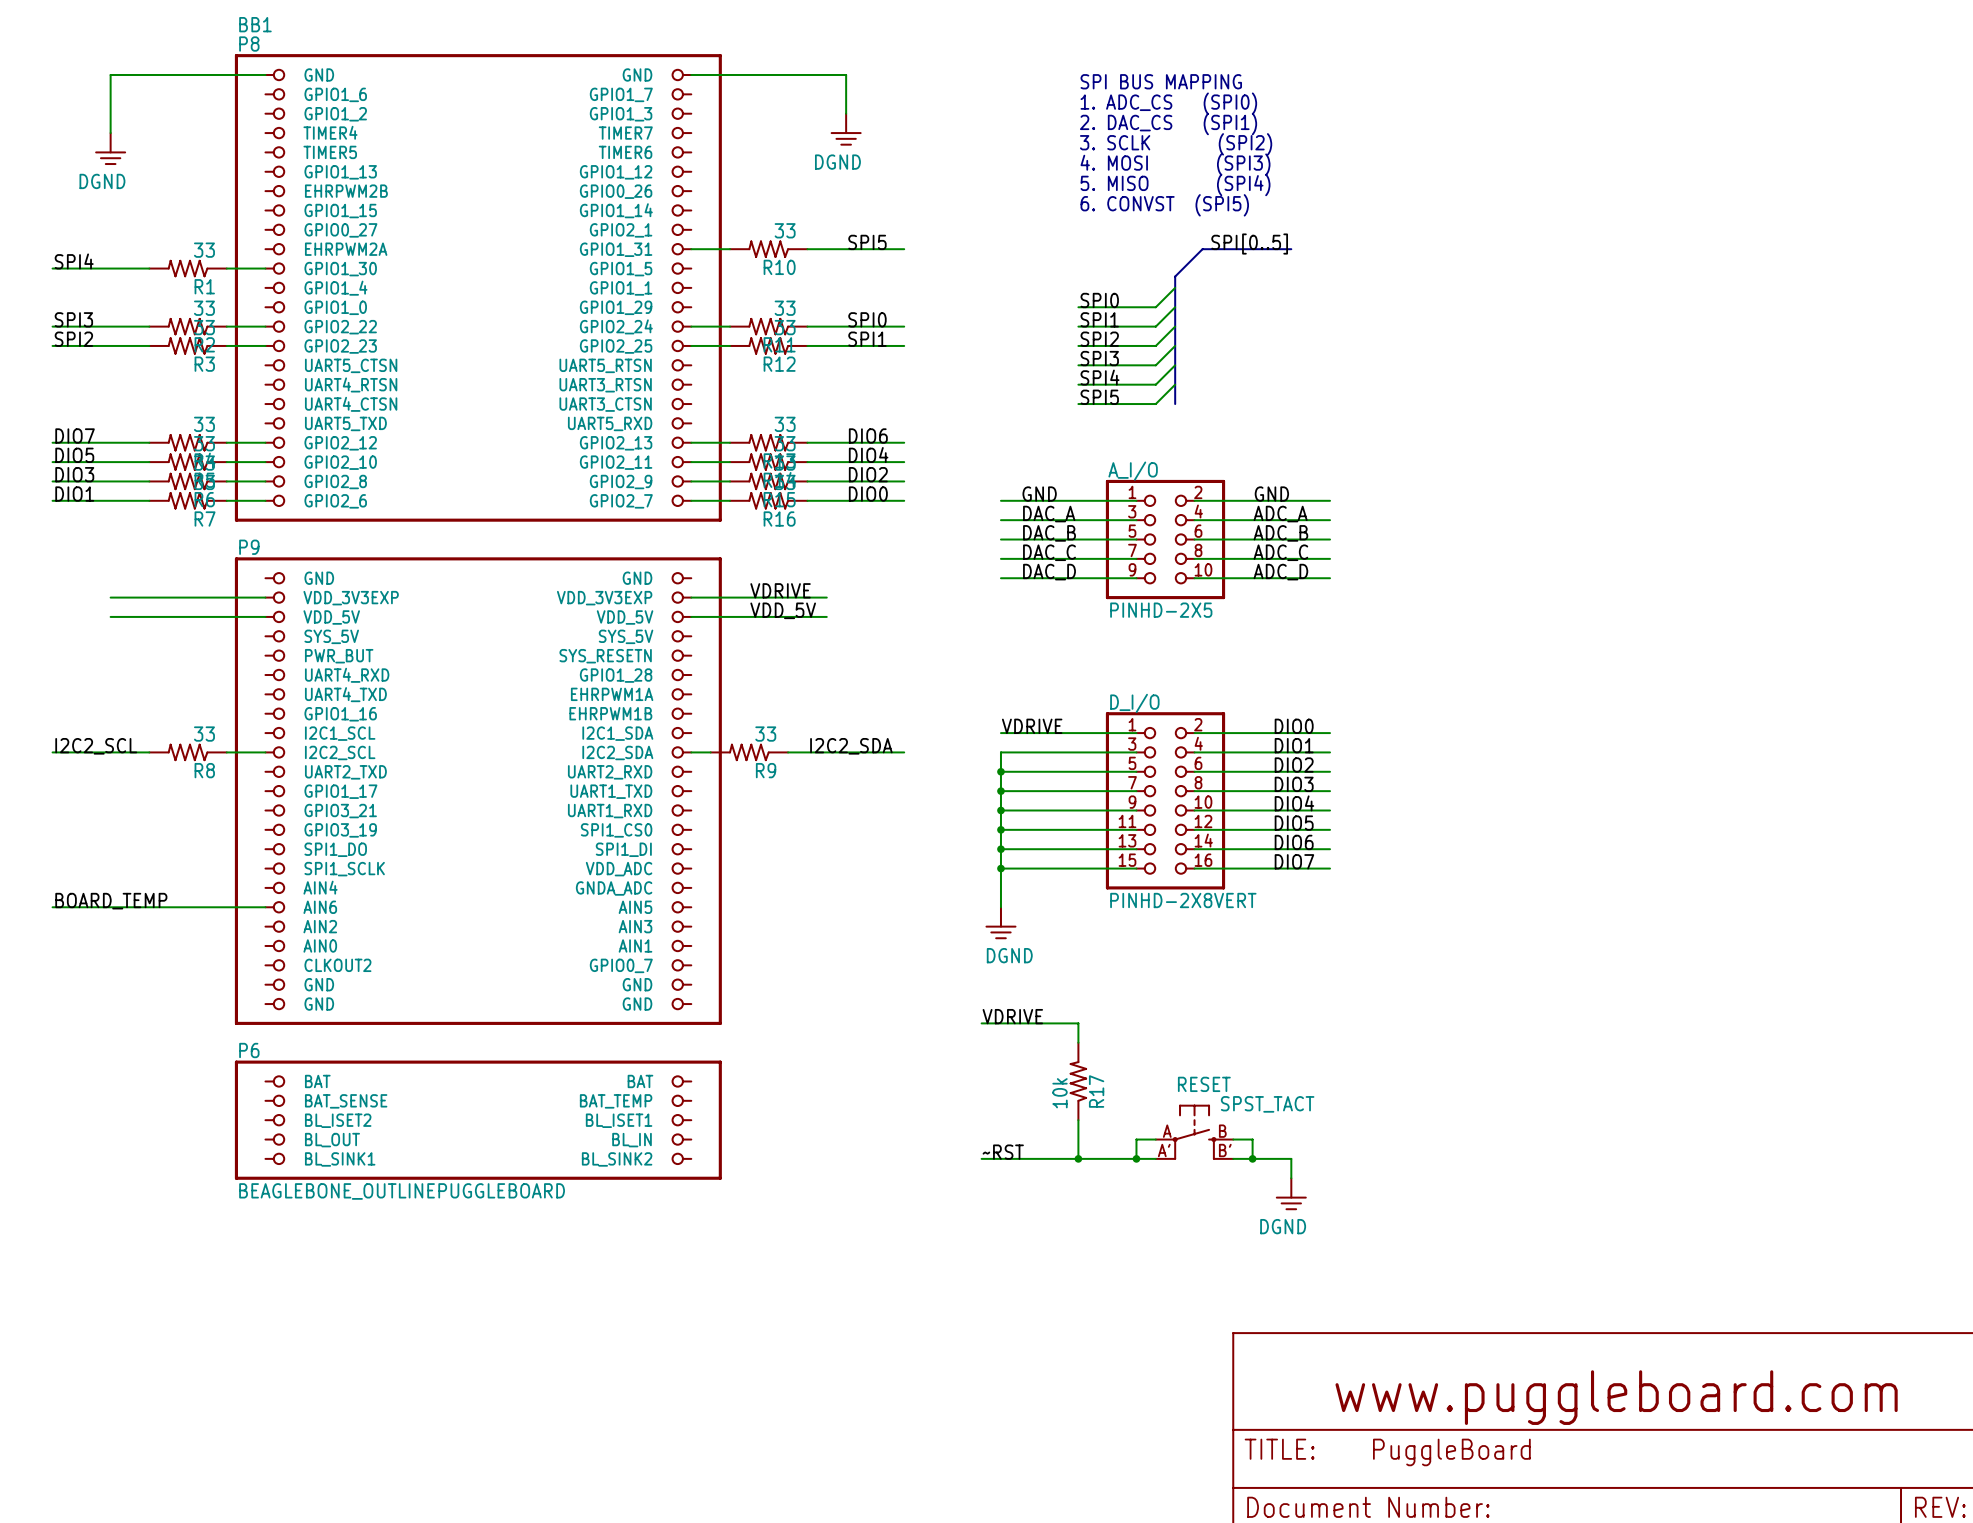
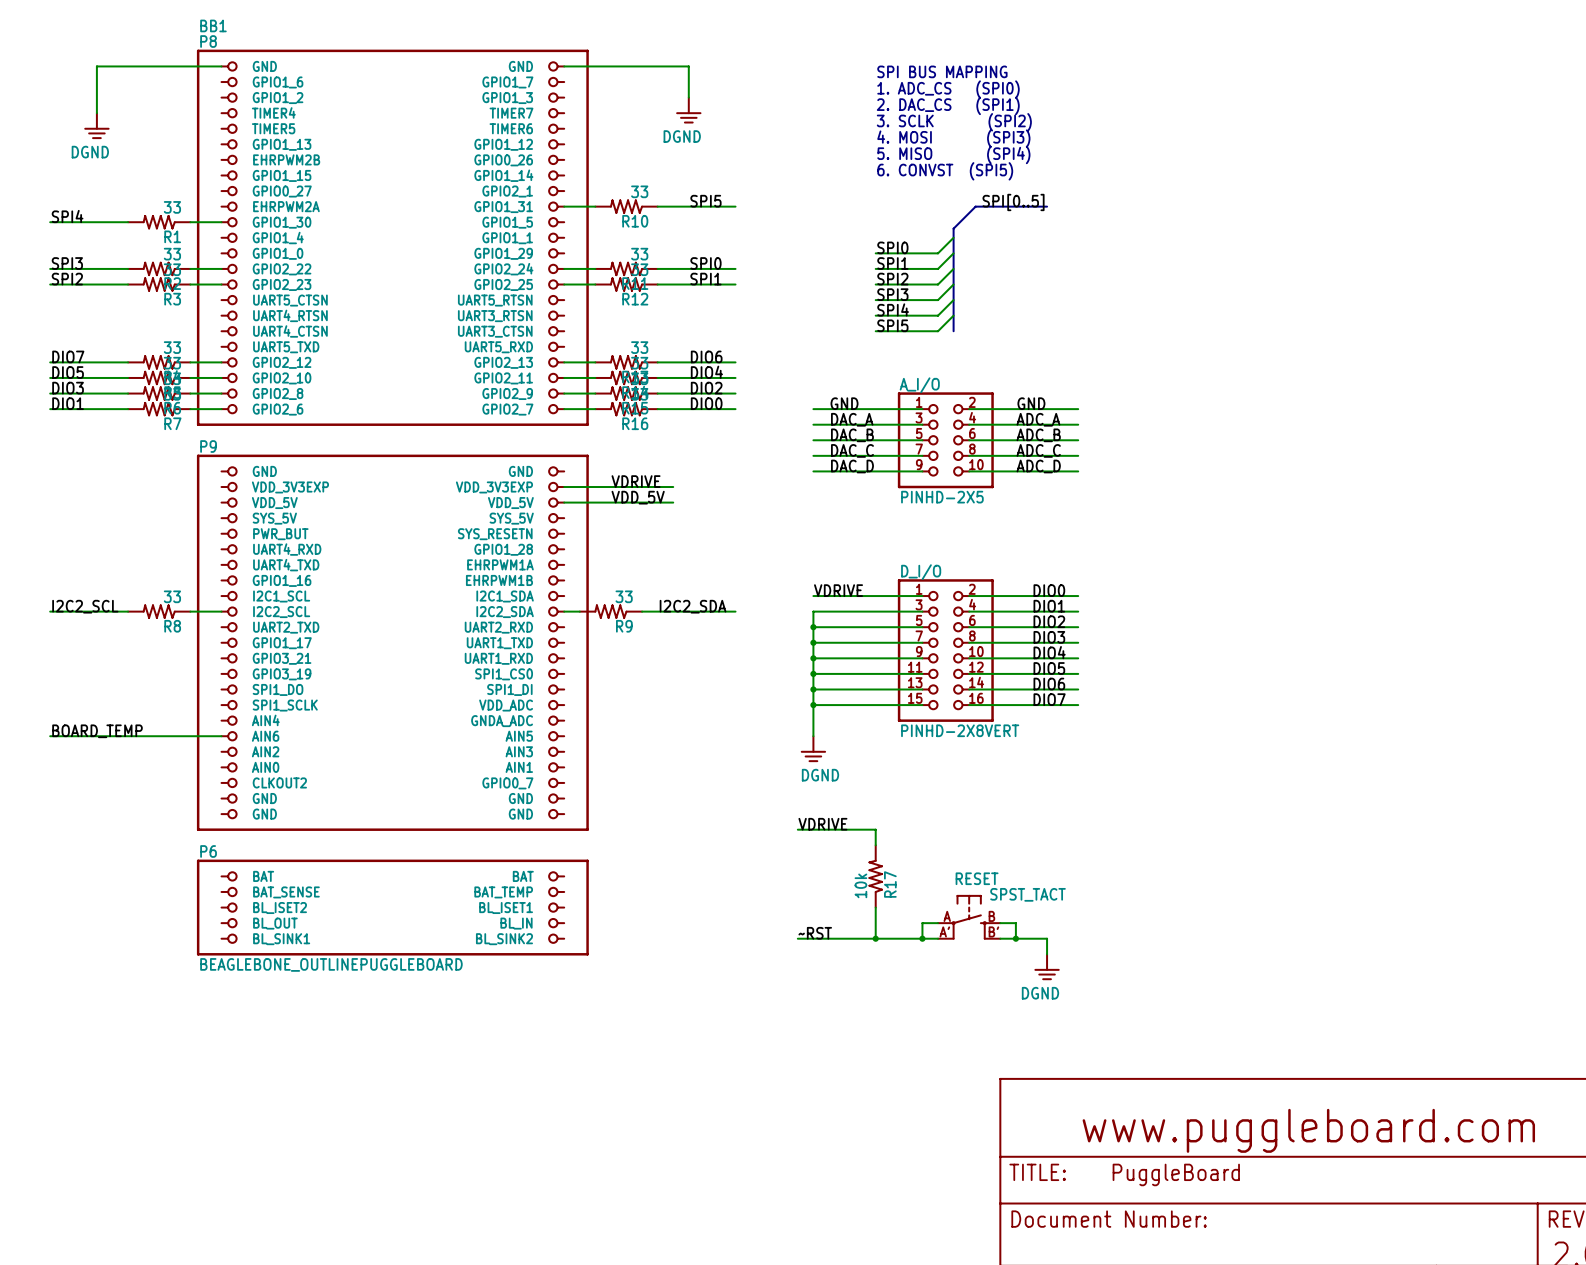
wire: (110, 597) (265, 597) -> none
wire: (110, 616) (265, 616) -> none

